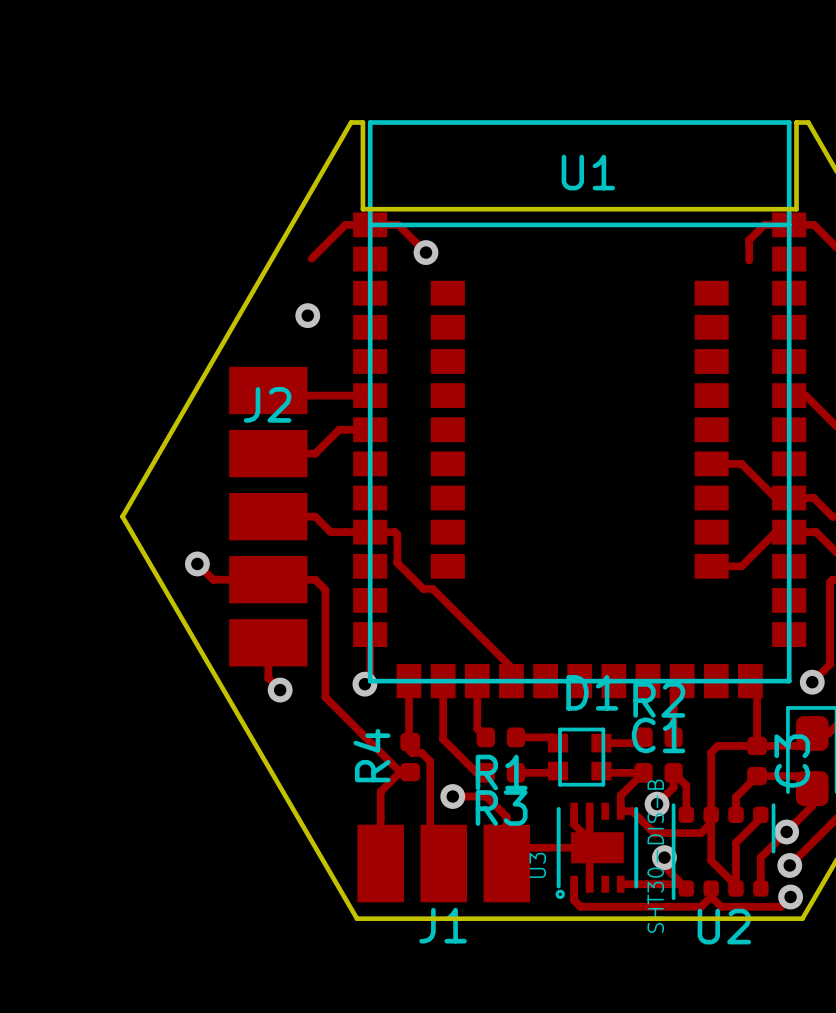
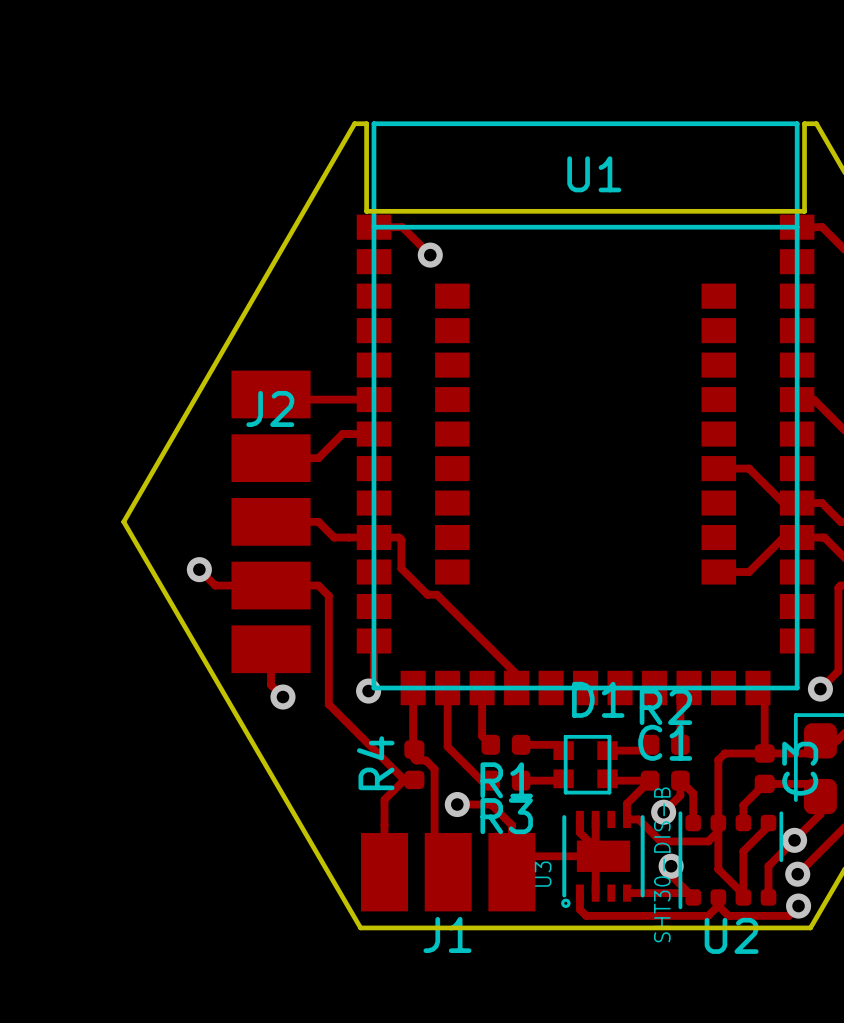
track: (370, 224) (345, 224) (311, 258) -> none
track: (789, 224) (764, 224) (749, 240) (749, 260) -> none
via: (307, 315) -> none

